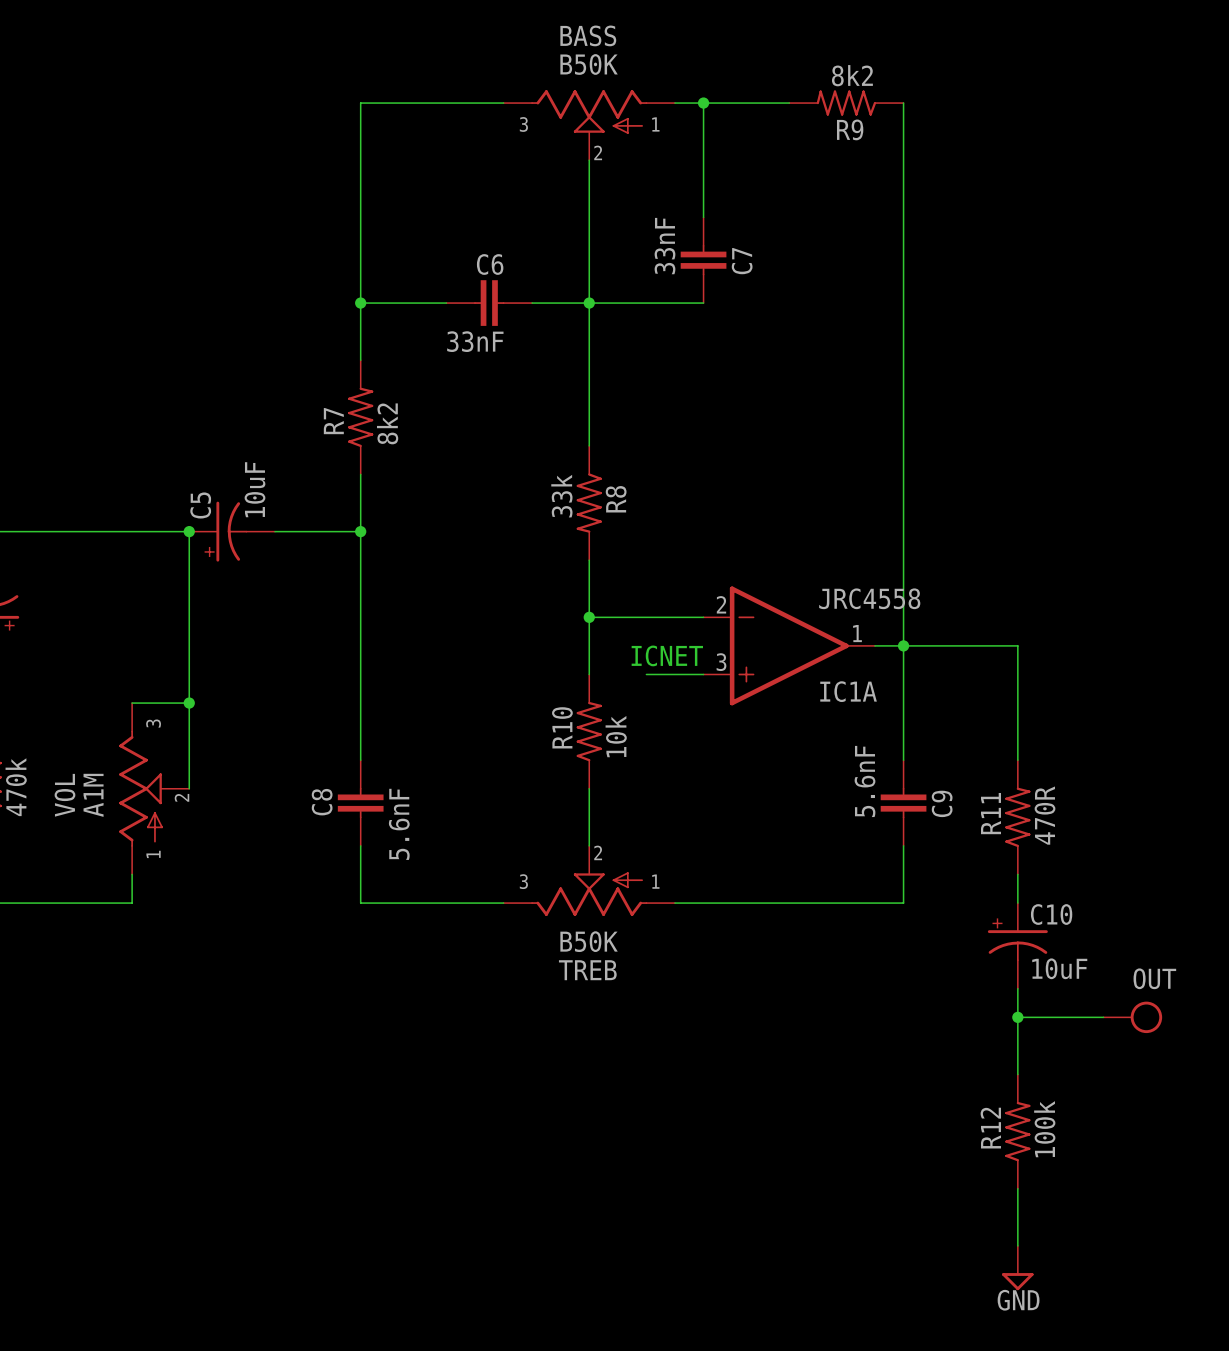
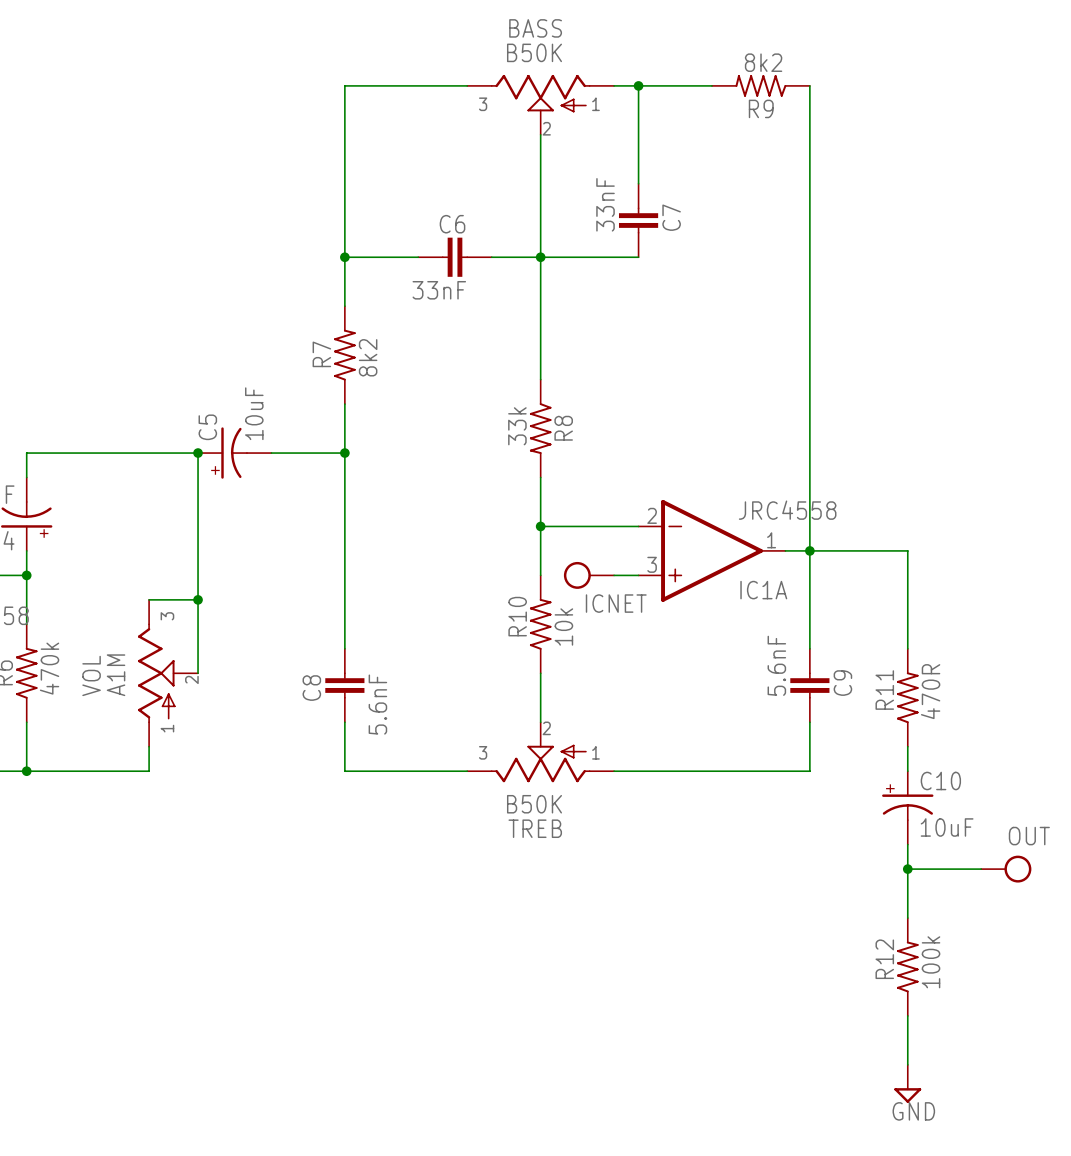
text: ICNET (667, 655) -> none
power symbol: none -> ICNET (589, 575)

